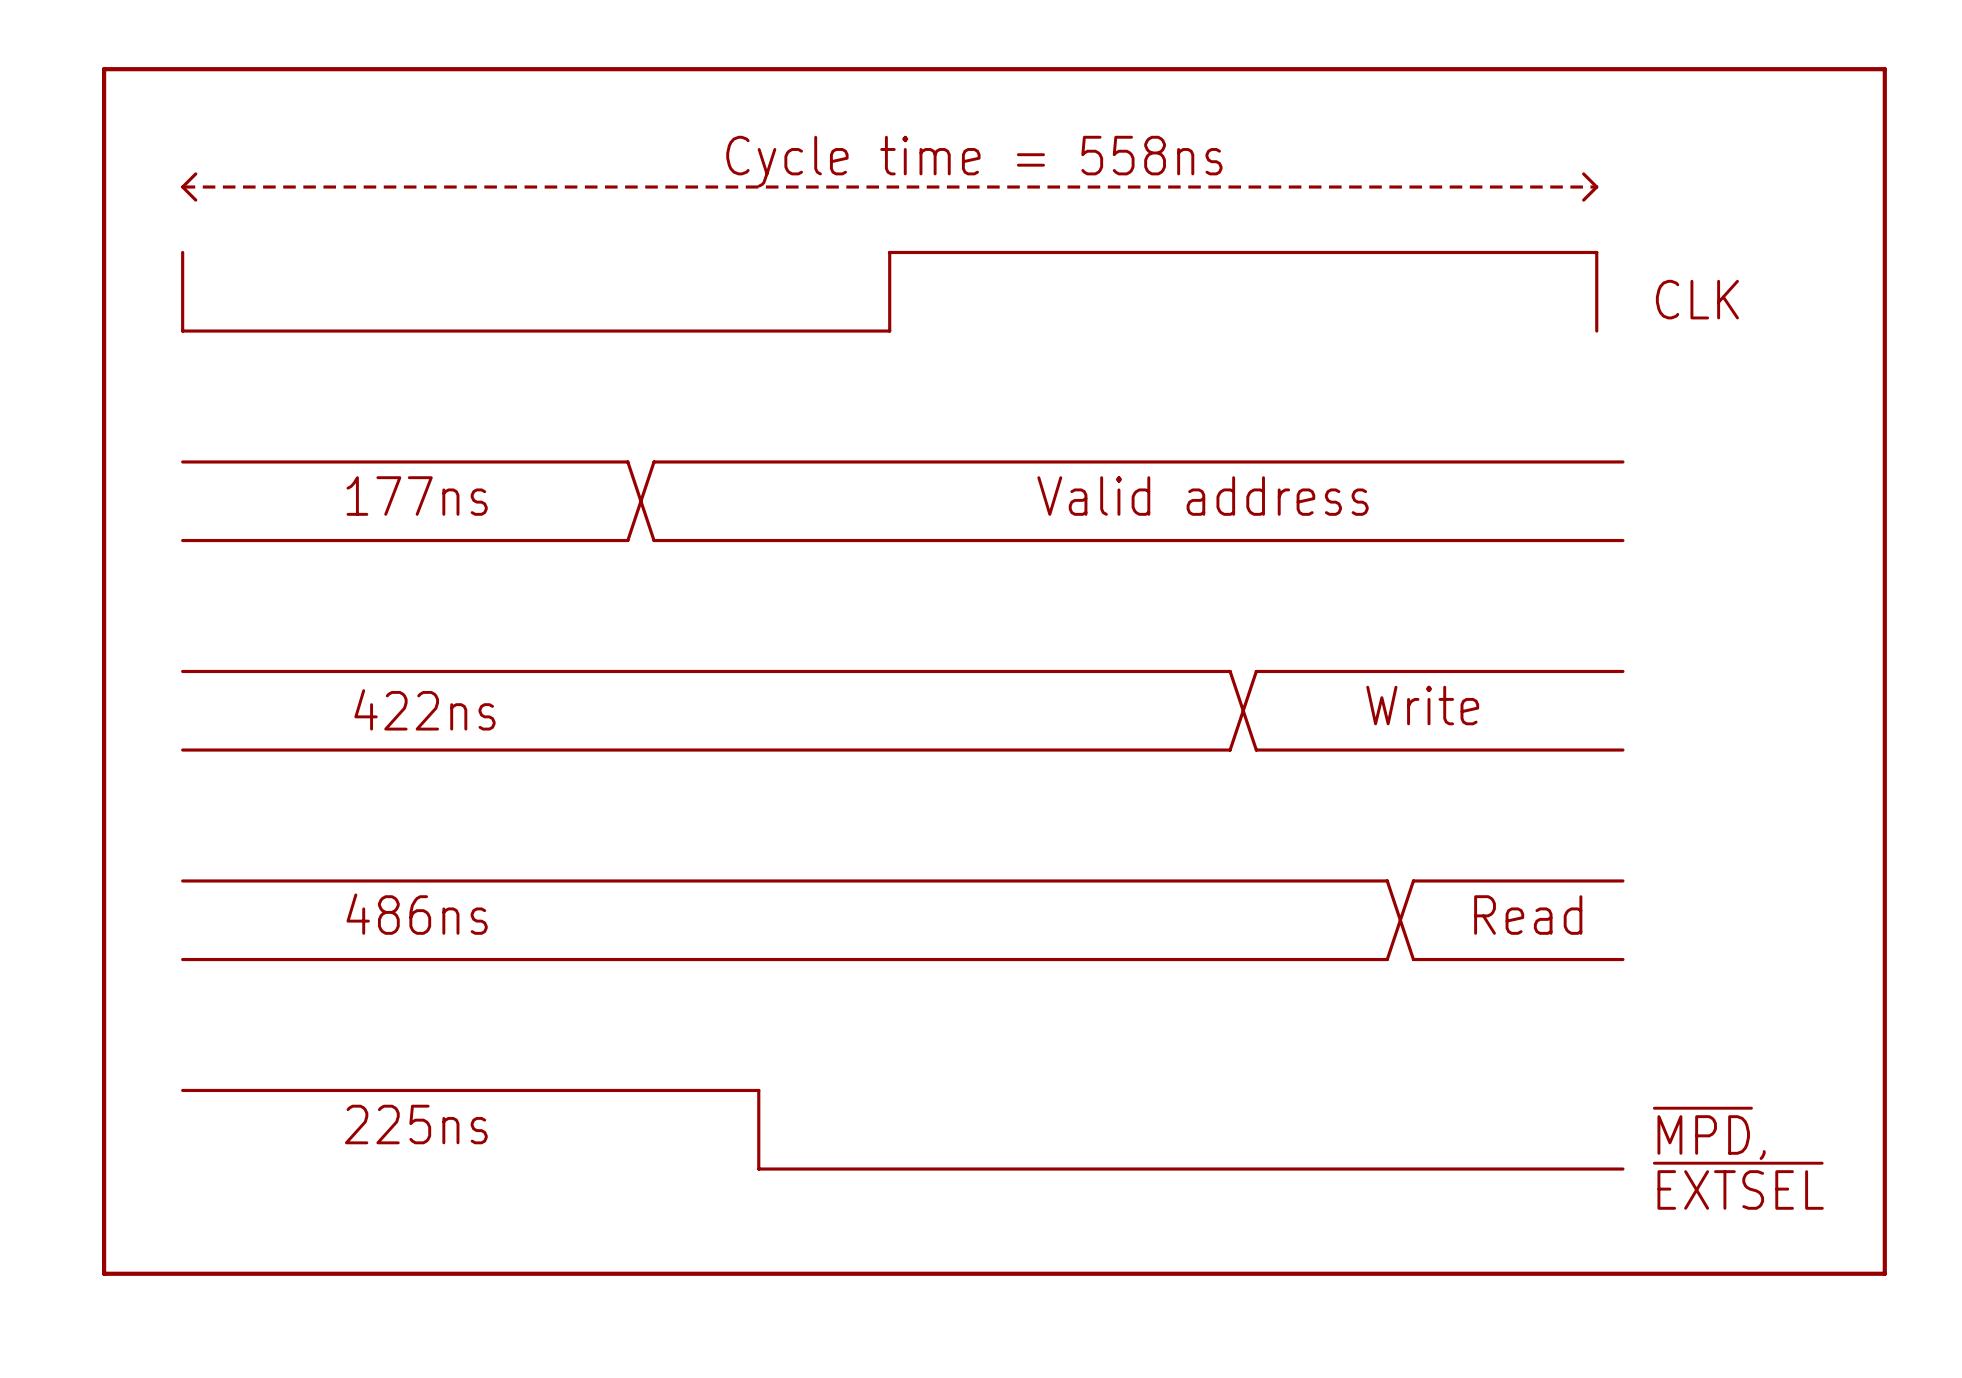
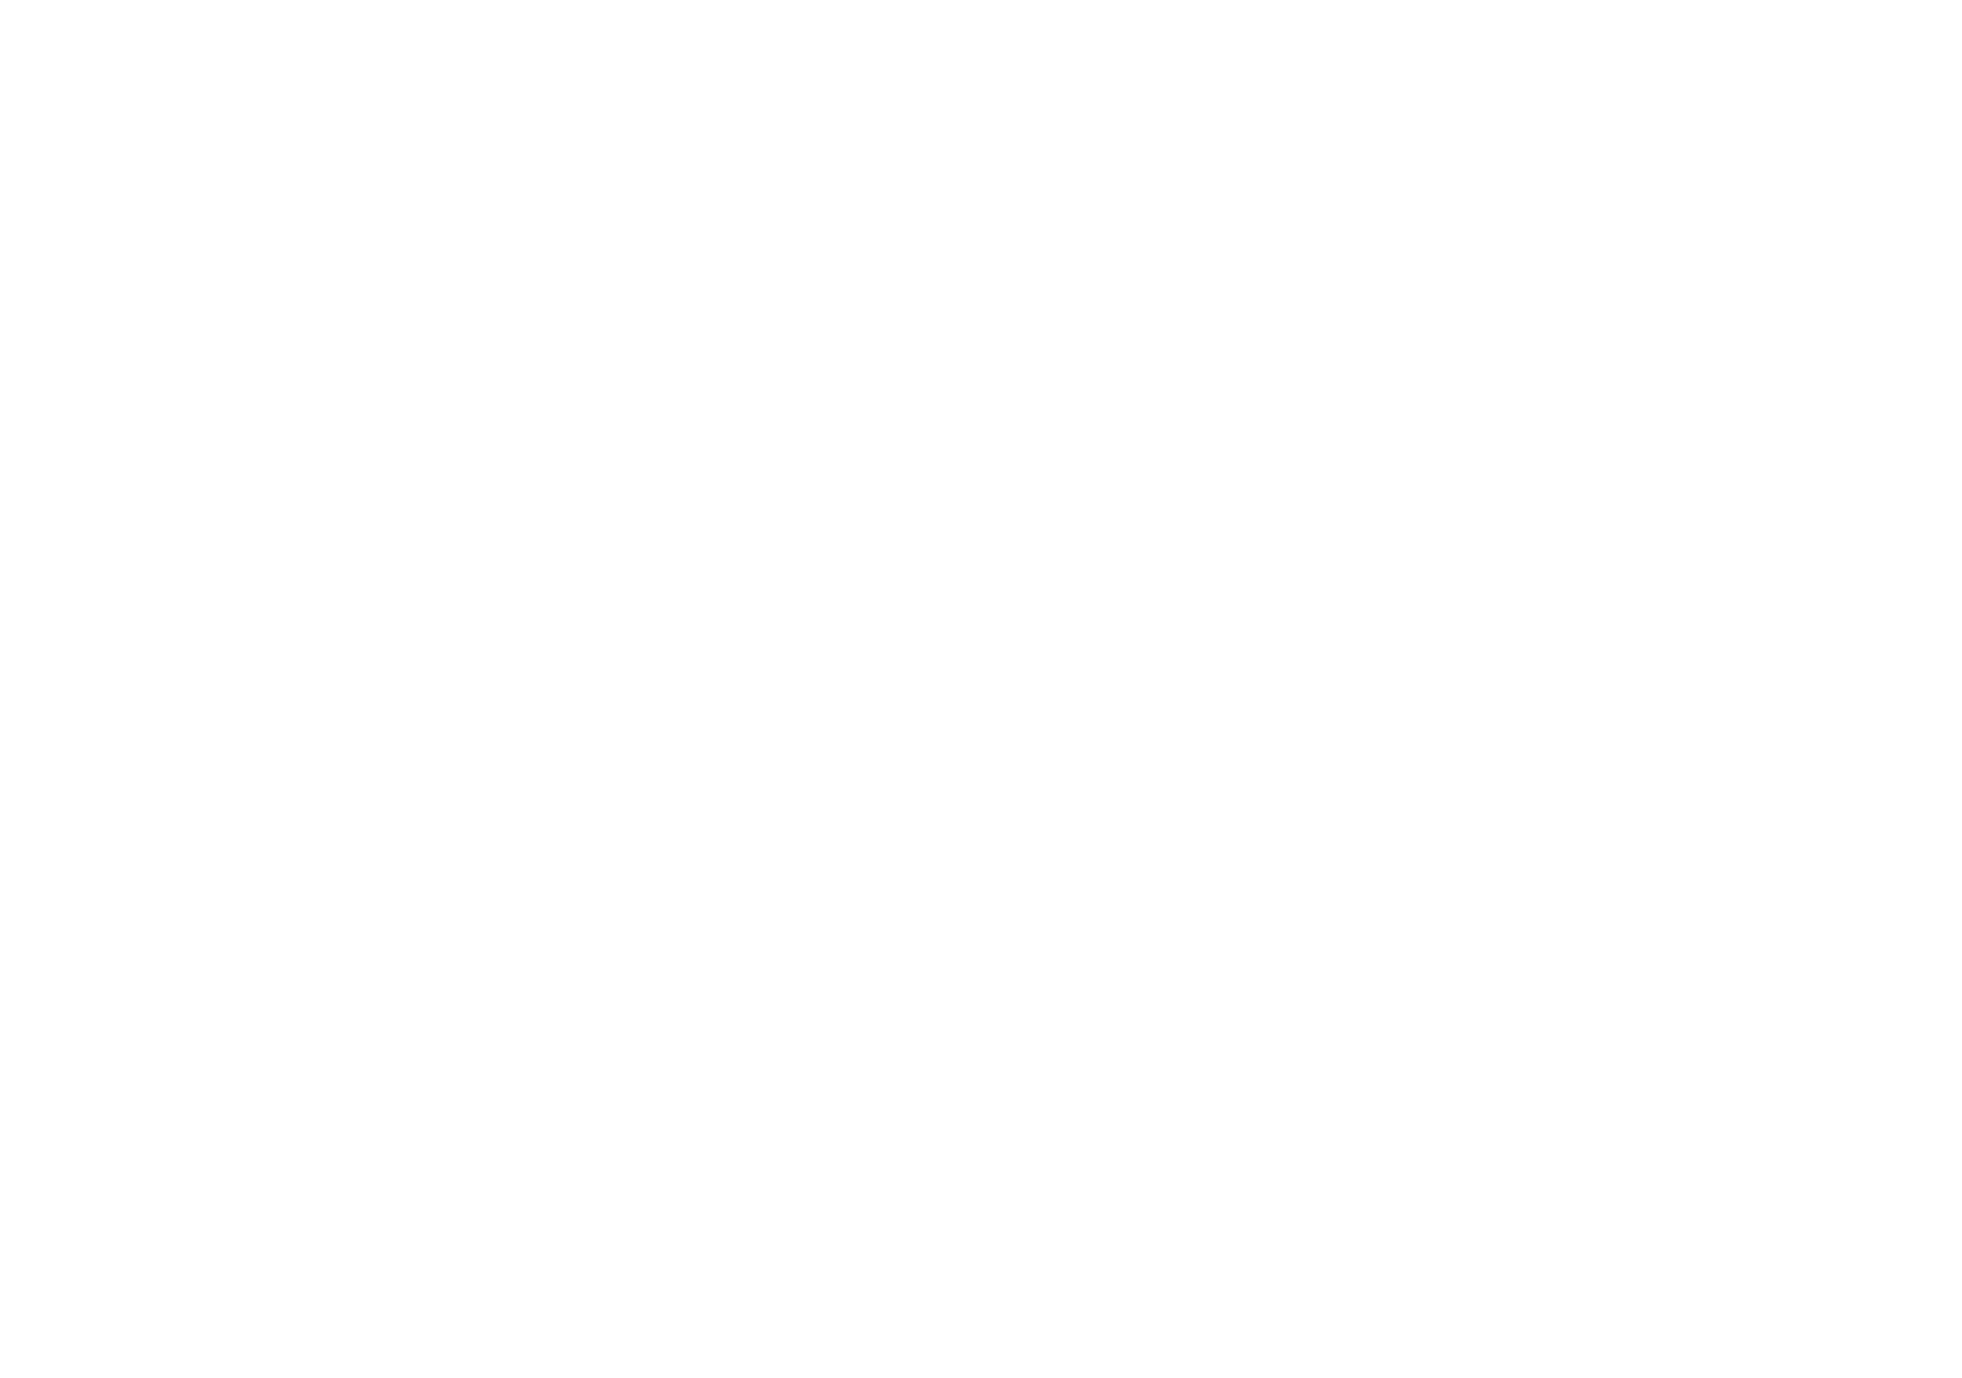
line: (104, 69) (1884, 69) (1884, 1273) (104, 1273) (104, 69) -> none
text: Cycle time = 558ns (974, 161) -> none
line: (195, 173) (182, 187) -> none
line: (1583, 173) (1596, 187) -> none
line: (182, 187) (195, 200) -> none
line: (182, 187) (1596, 187) -> none
line: (1596, 187) (1583, 200) -> none
line: (182, 252) (182, 331) (889, 331) (889, 252) (1596, 252) (1596, 331) -> none
text: CLK (1697, 299) -> none
line: (182, 461) (627, 461) (654, 540) (1622, 540) -> none
line: (1622, 461) (654, 461) (627, 540) (182, 540) -> none
text: 177ns (417, 496) -> none
text: Valid address (1203, 496) -> none
line: (182, 671) (1230, 671) (1256, 750) (1622, 750) -> none
line: (1622, 671) (1256, 671) (1230, 750) (182, 750) -> none
text: Write (1422, 705) -> none
text: 422ns (424, 709) -> none
line: (182, 880) (1387, 880) (1413, 959) (1622, 959) -> none
line: (1622, 880) (1413, 880) (1387, 959) (182, 959) -> none
text: 486ns (417, 914) -> none
text: Read (1528, 915) -> none
line: (182, 1090) (758, 1090) (758, 1169) (1622, 1169) -> none
text: 225ns (416, 1124) -> none
text: ~{MPD}, (1709, 1133) -> none
text: ~{EXTSEL} (1738, 1185) -> none

